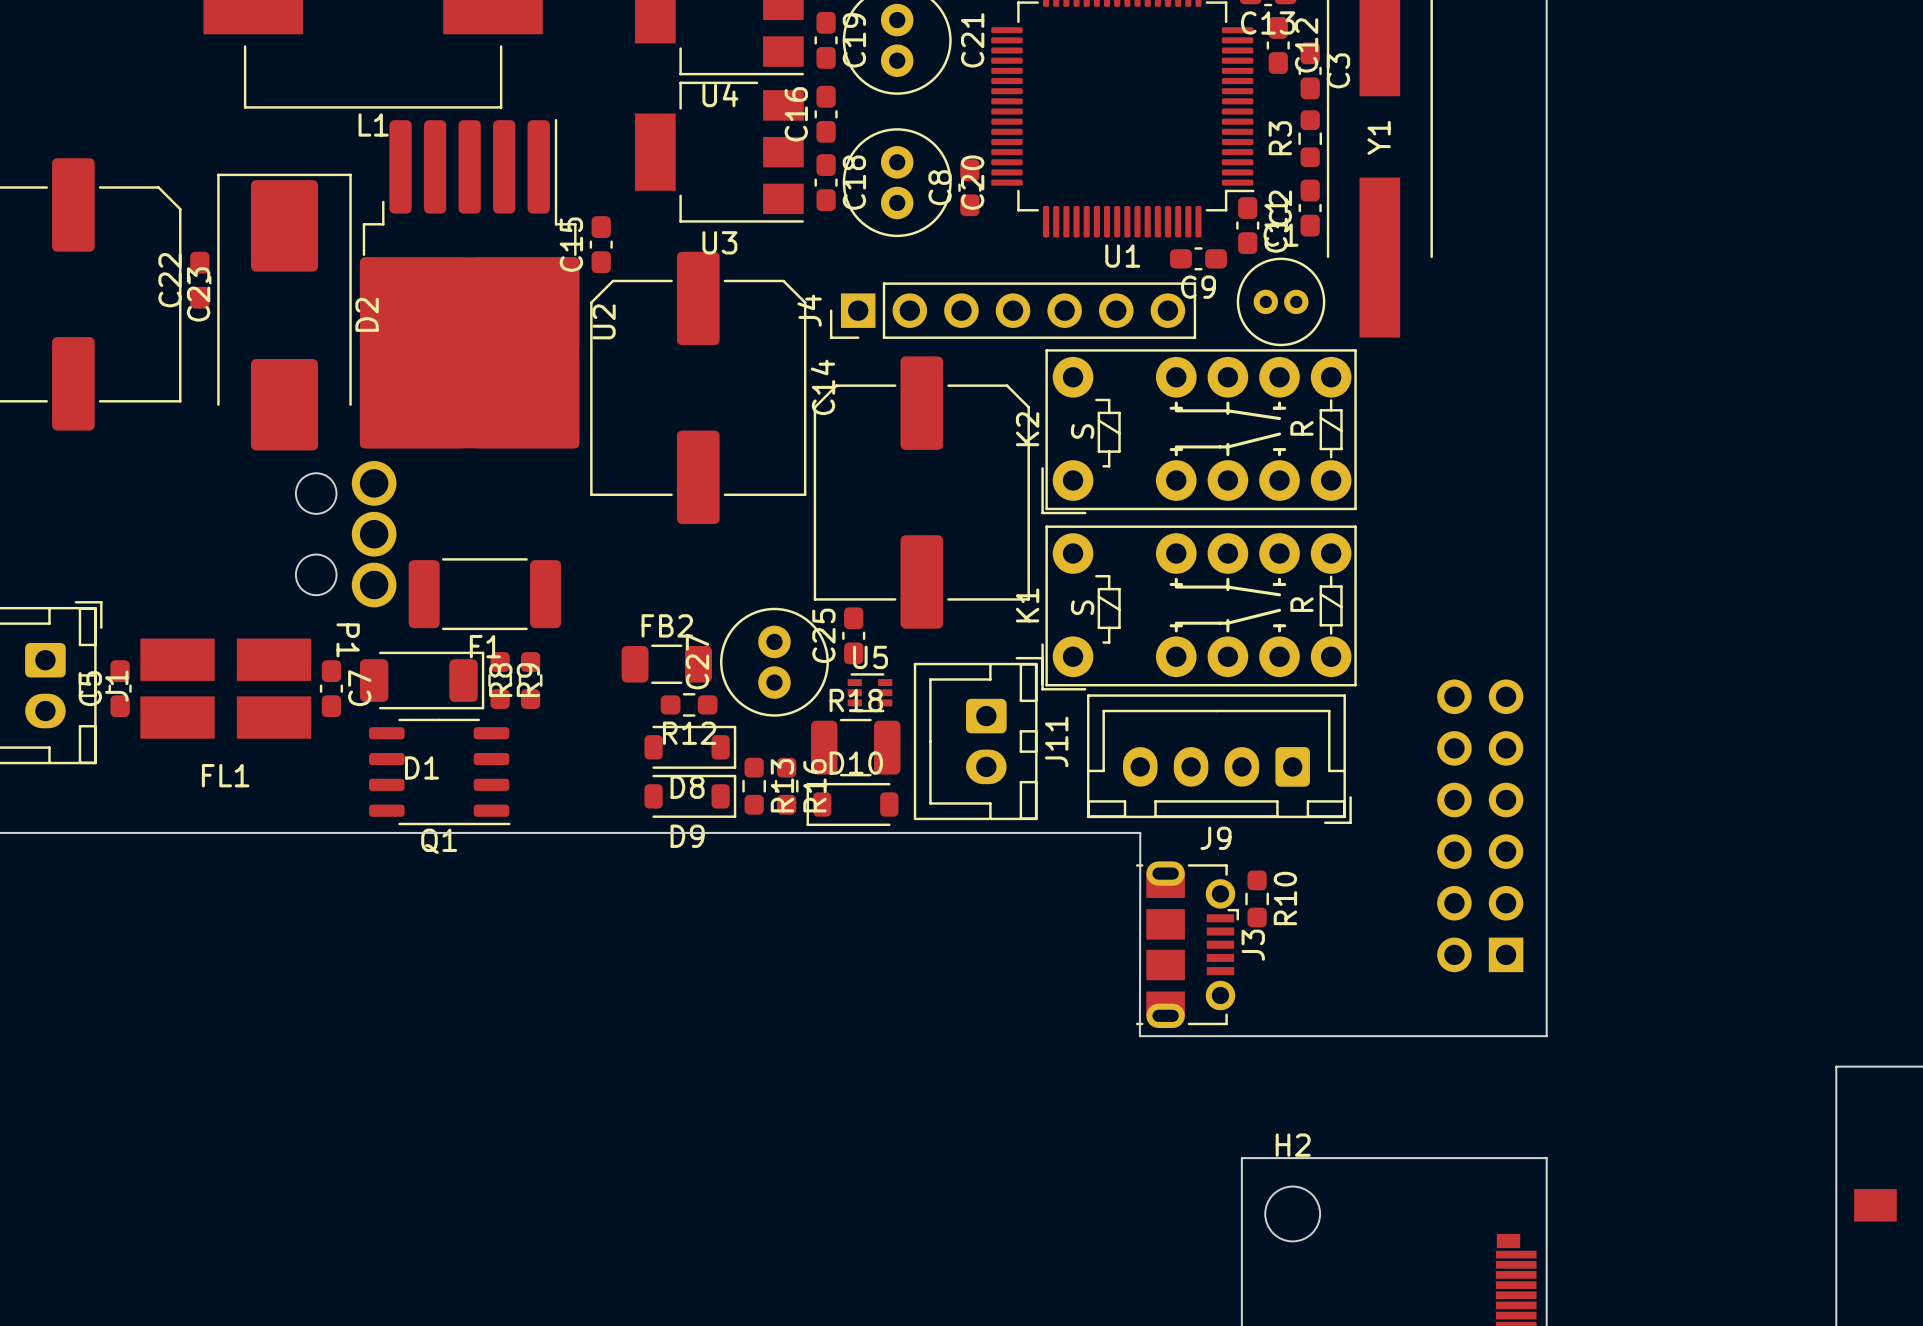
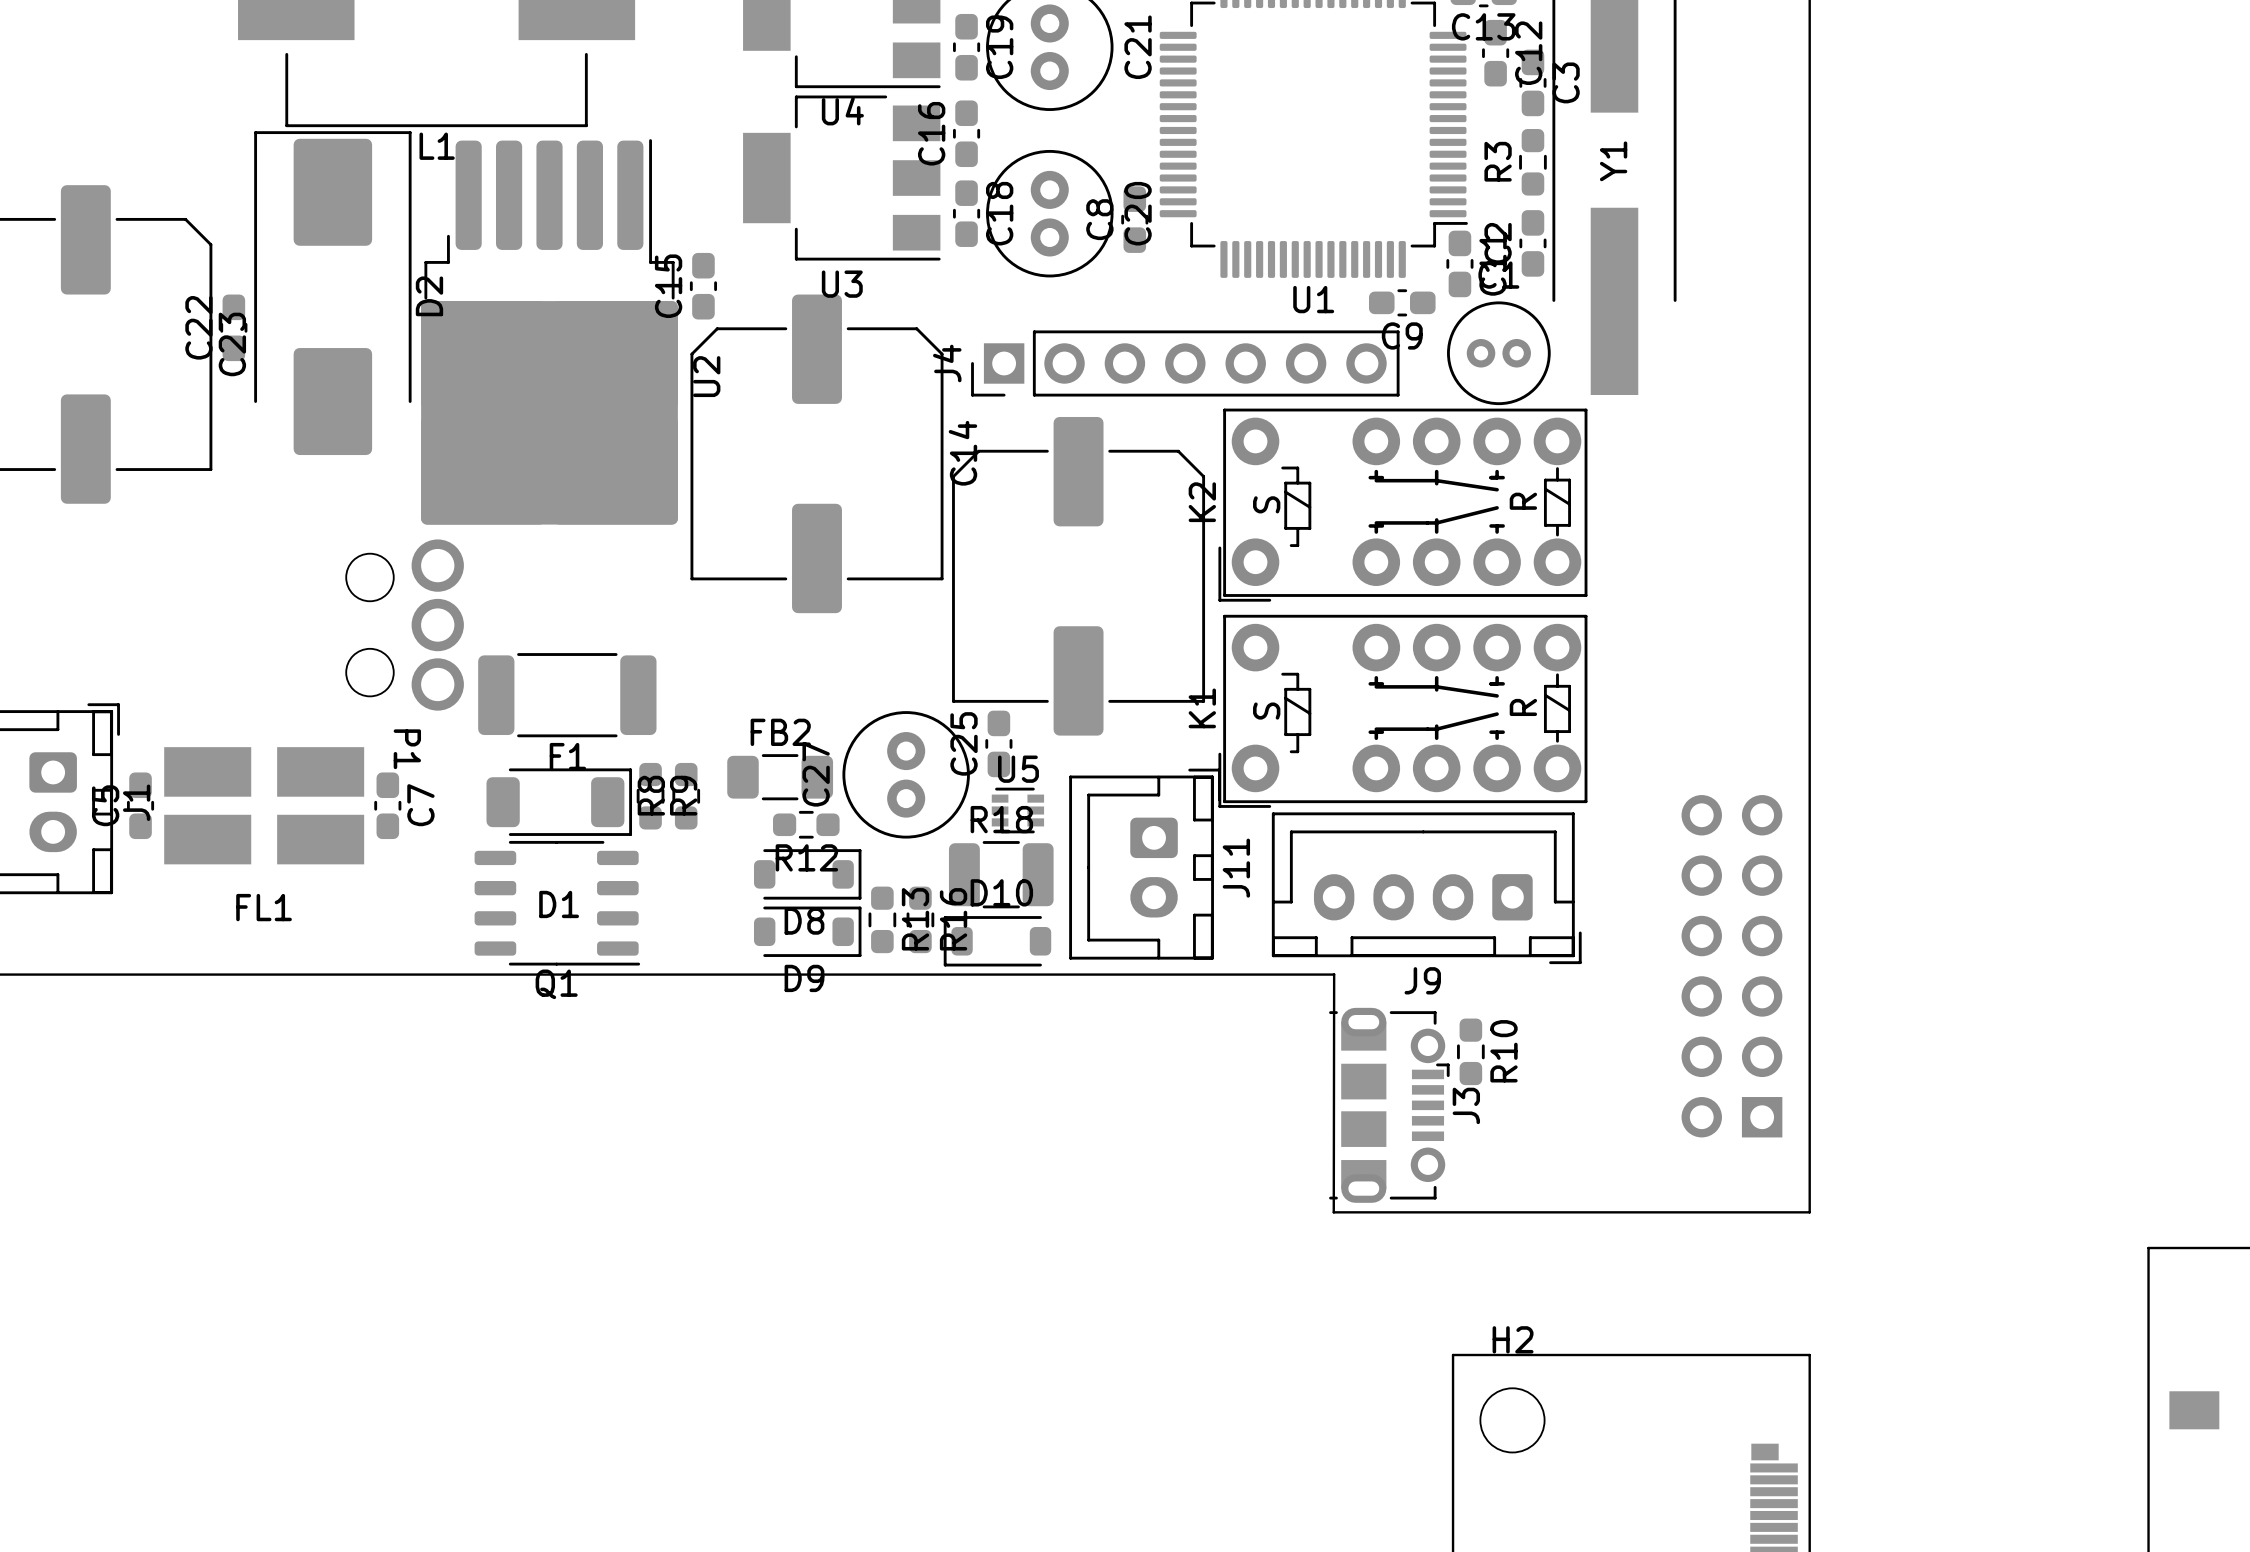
D2 position: (284, 312) -> (332, 293)
D1 position: (422, 680) -> (559, 802)
R9 position: (500, 680) -> (650, 796)
R8 position: (530, 680) -> (686, 796)
Q1 position: (439, 771) -> (557, 903)

